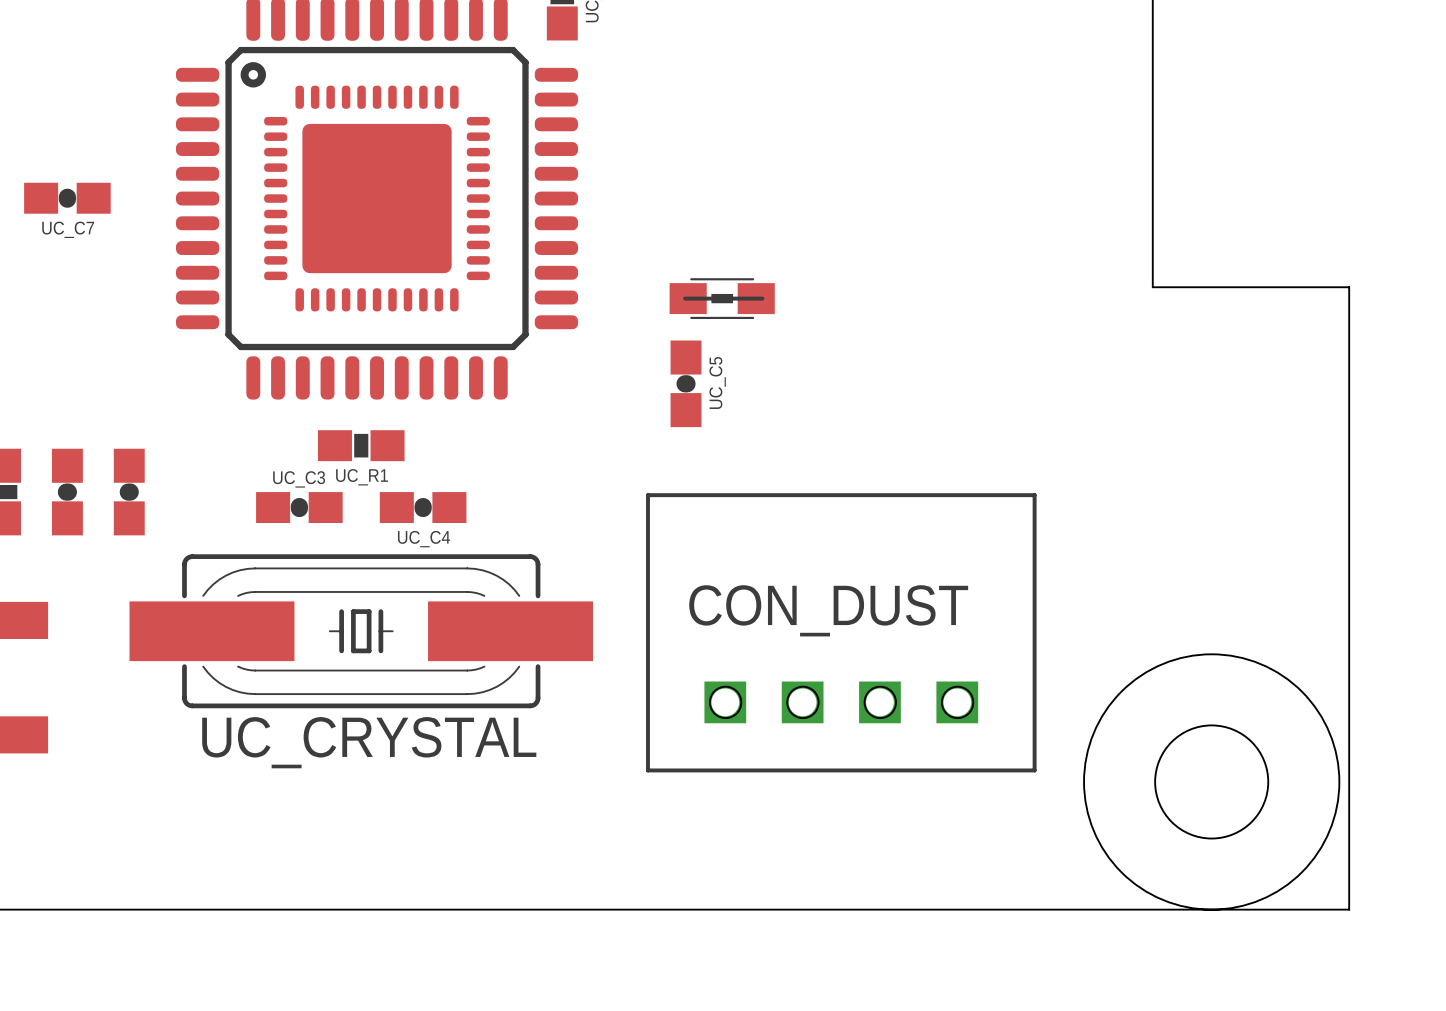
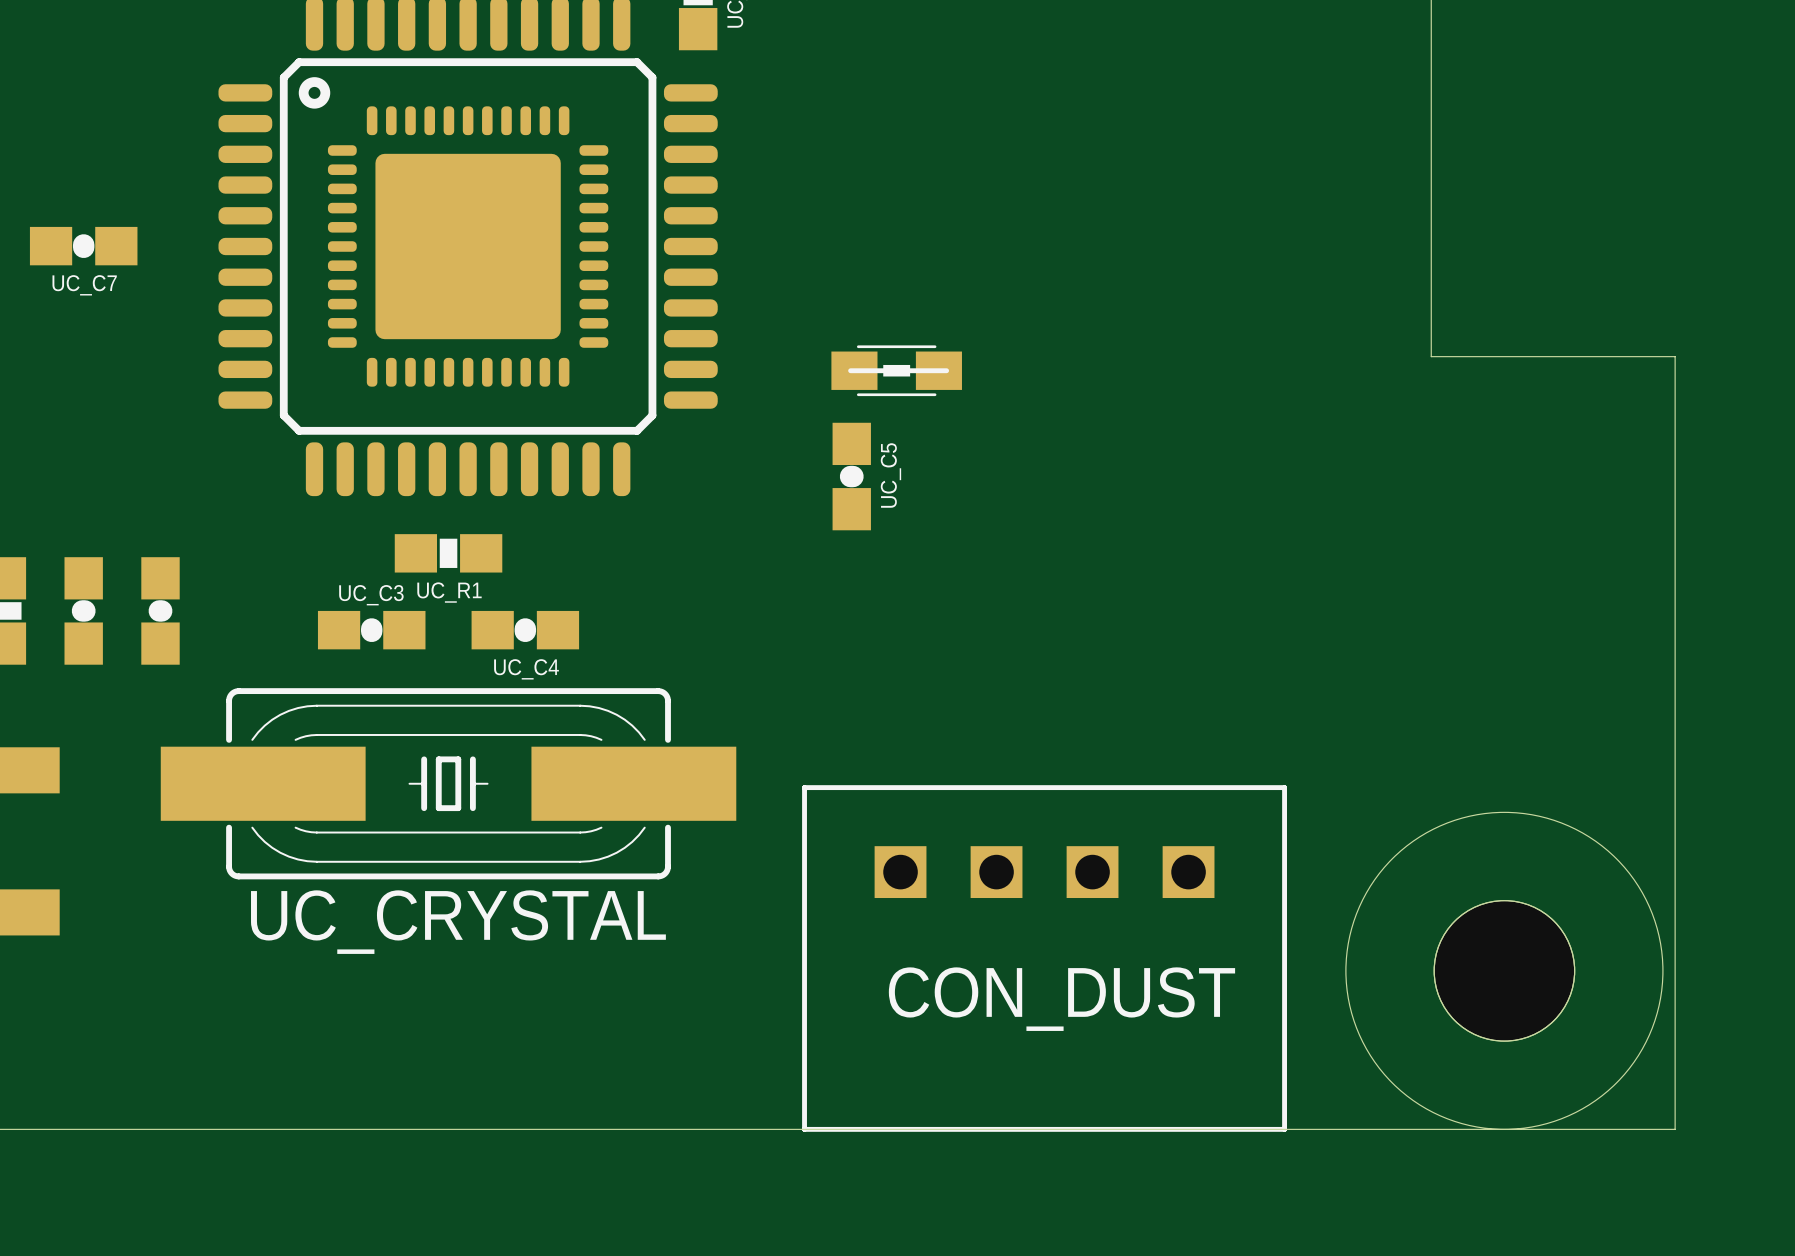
CON_DUST rotation: 0° (841, 632) -> 180° (1044, 958)
round board edge: [709, 686, 742, 719] -> none
round board edge: [786, 686, 820, 719] -> none
round board edge: [864, 686, 897, 719] -> none
round board edge: [941, 686, 974, 719] -> none
hole: none -> (1504, 970)

